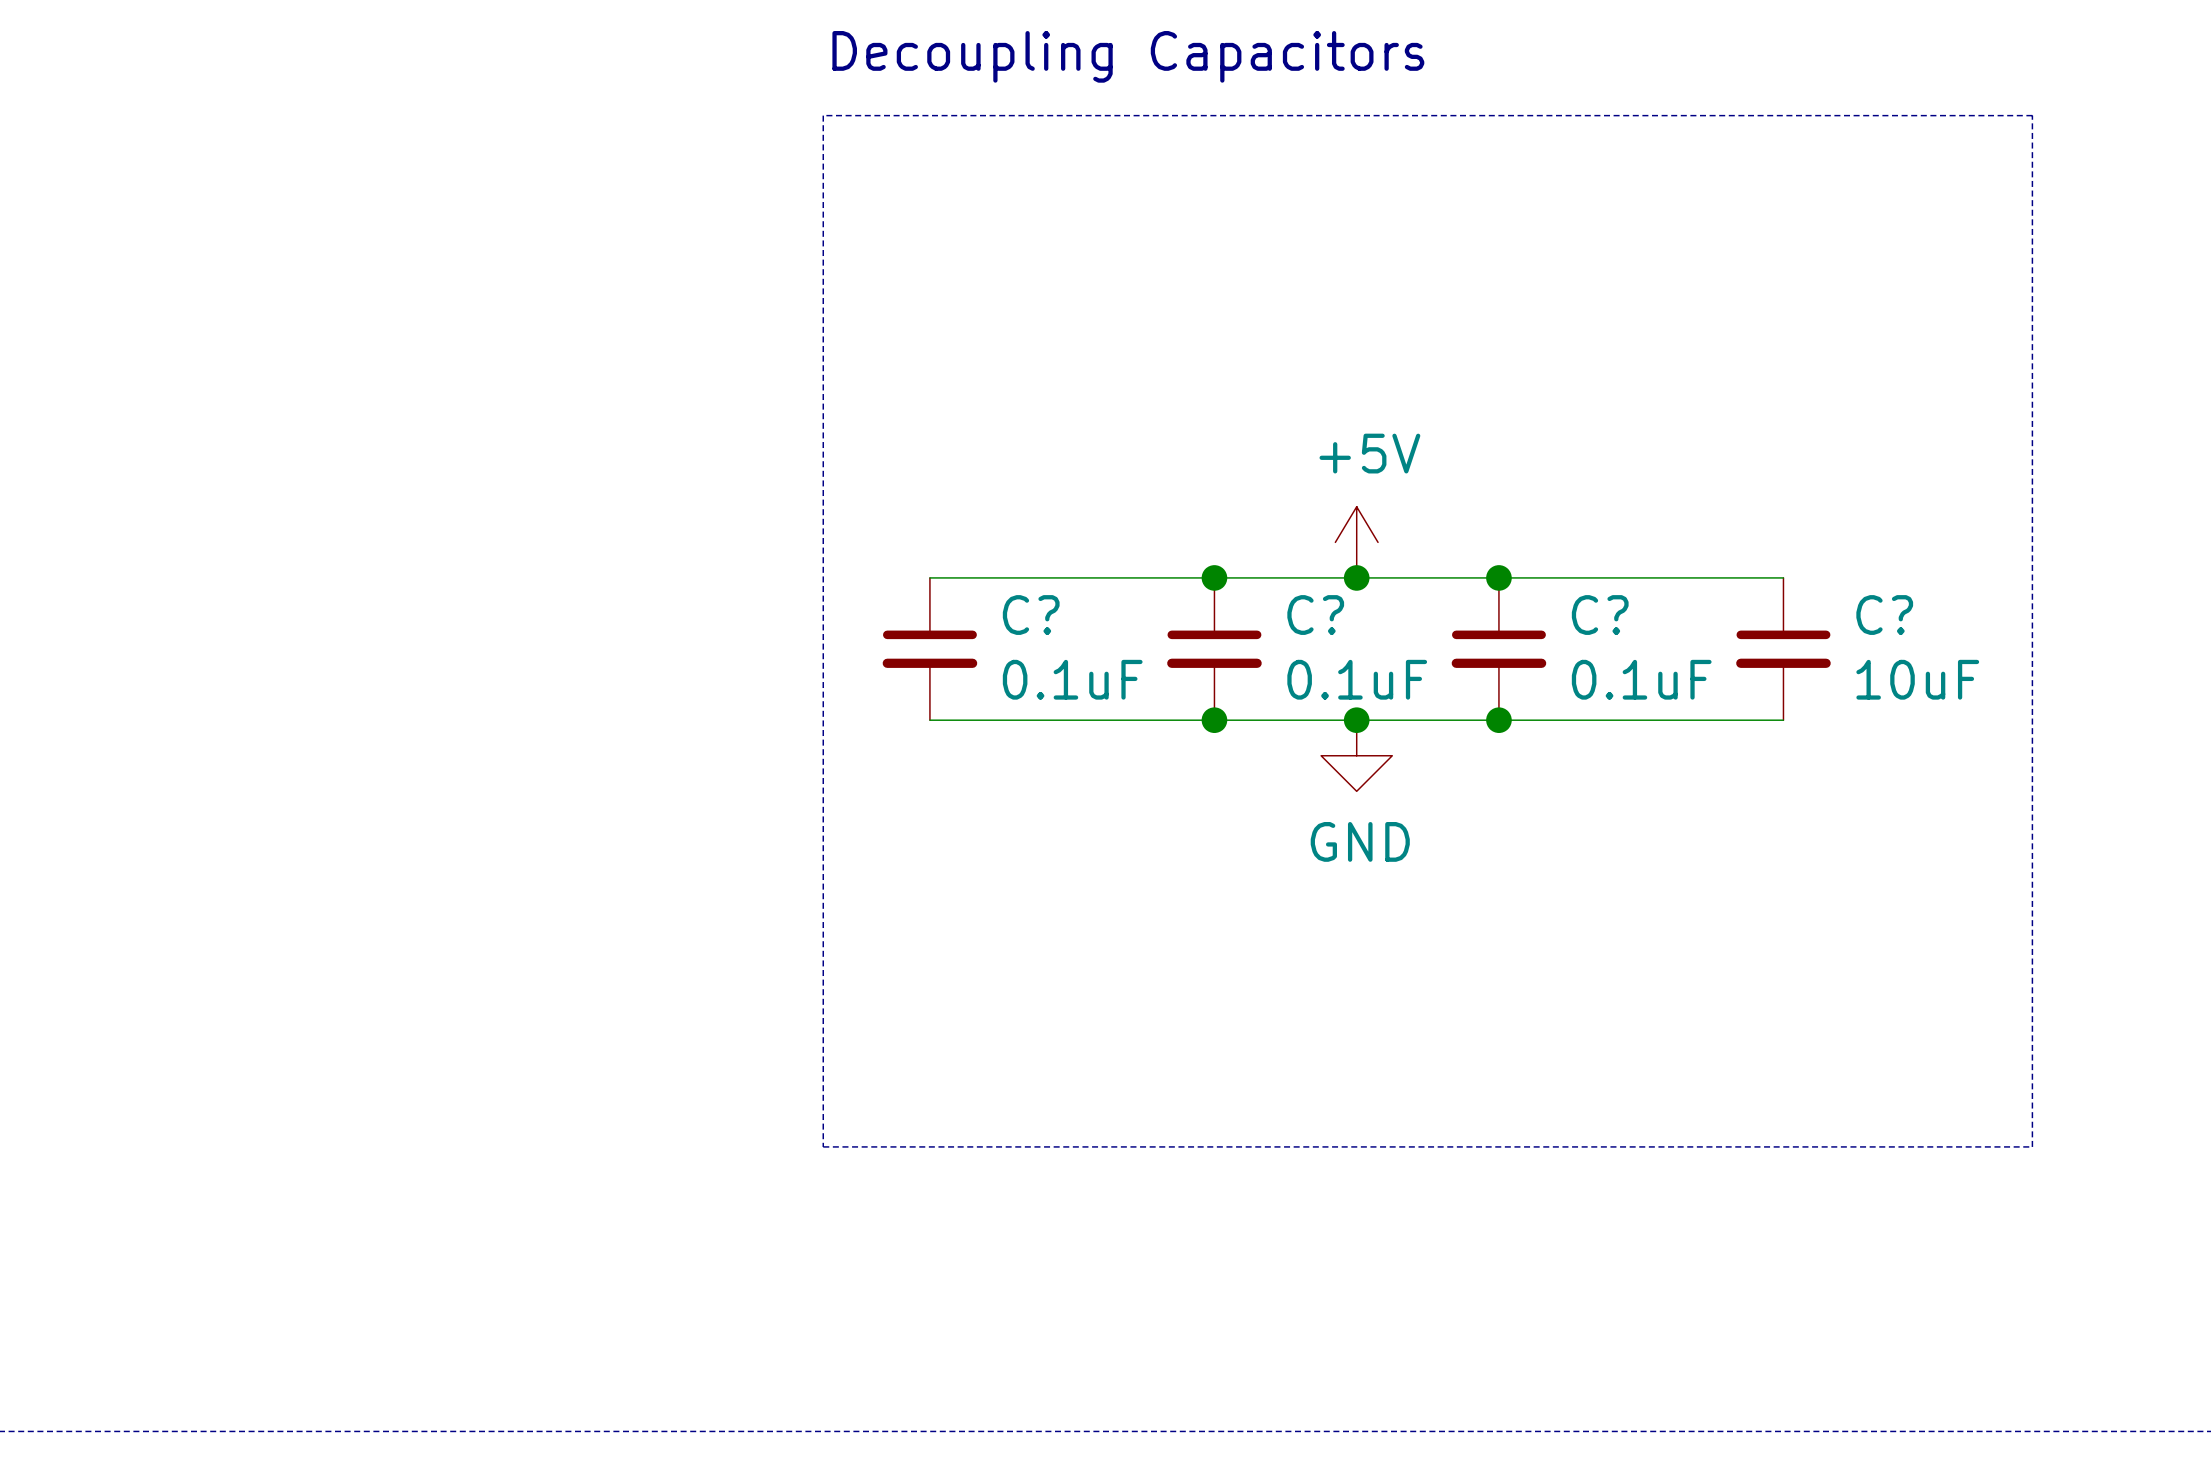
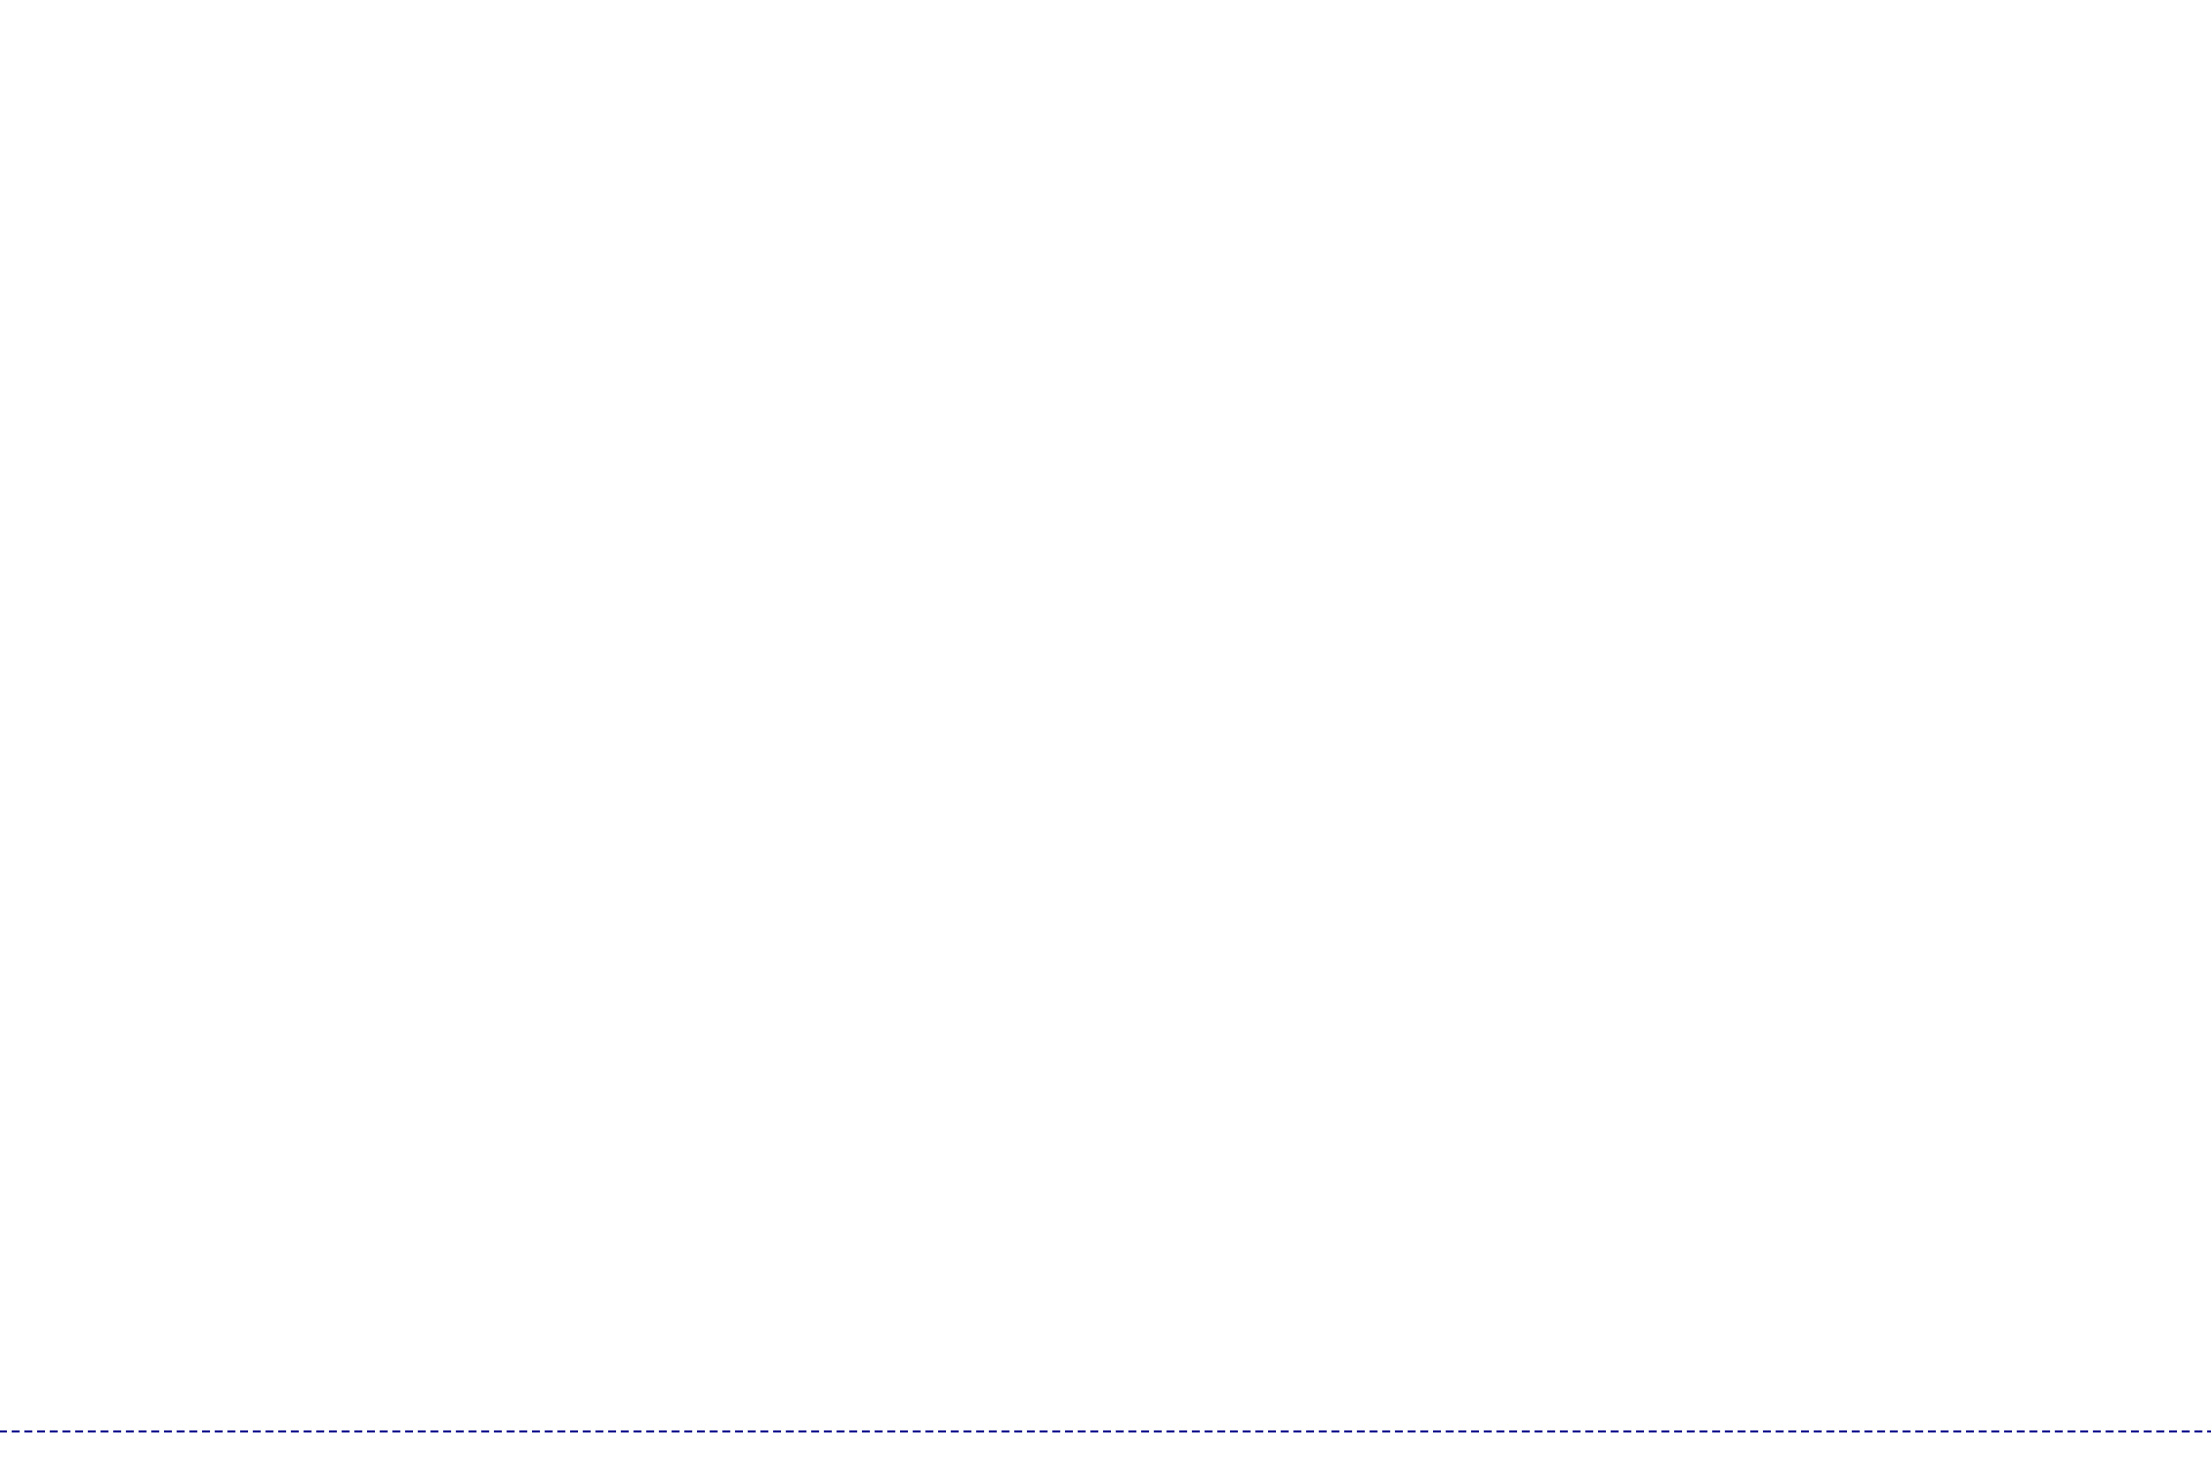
text: Decoupling Capacitors (1128, 56) -> none
line: (823, 115) (823, 1146) (2032, 1146) (2032, 115) (823, 115) -> none
power symbol: +5V (1356, 542) -> none
wire: (929, 577) (1783, 577) -> none
junction: (1214, 577) -> none
junction: (1356, 577) -> none
junction: (1498, 577) -> none
C?: 0.1uF (929, 649) -> none
C?: 0.1uF (1214, 649) -> none
C?: 0.1uF (1498, 649) -> none
C?: 10uF (1783, 649) -> none
wire: (929, 720) (1783, 720) -> none
junction: (1214, 720) -> none
junction: (1356, 720) -> none
junction: (1498, 720) -> none
power symbol: GND (1356, 755) -> none

